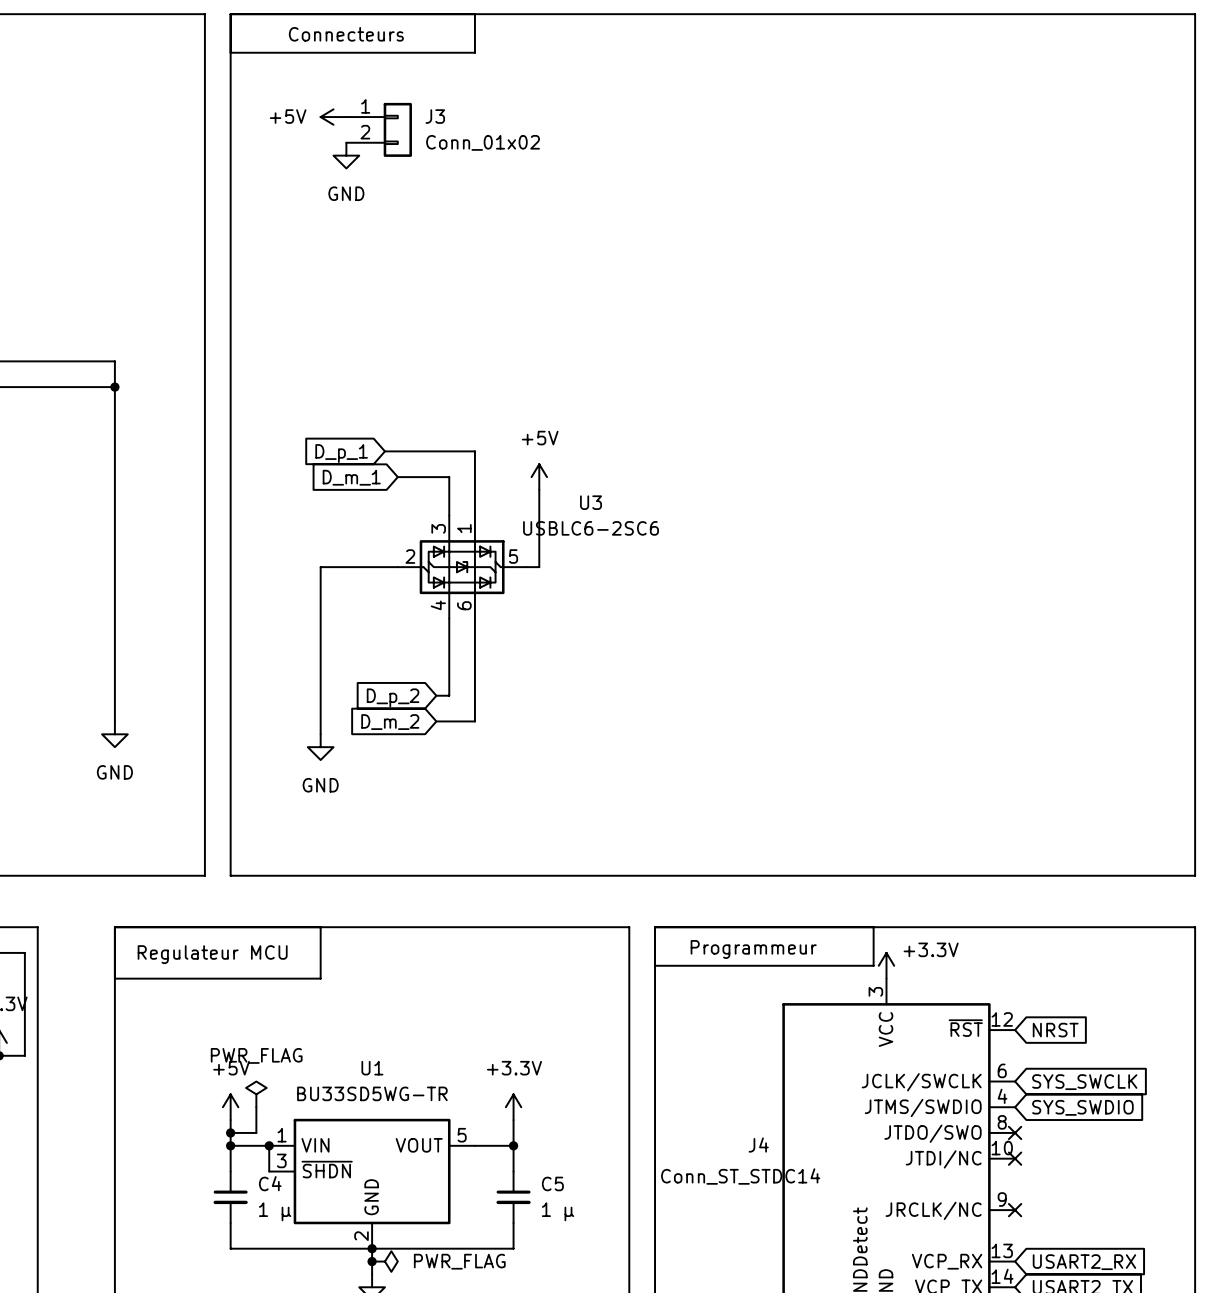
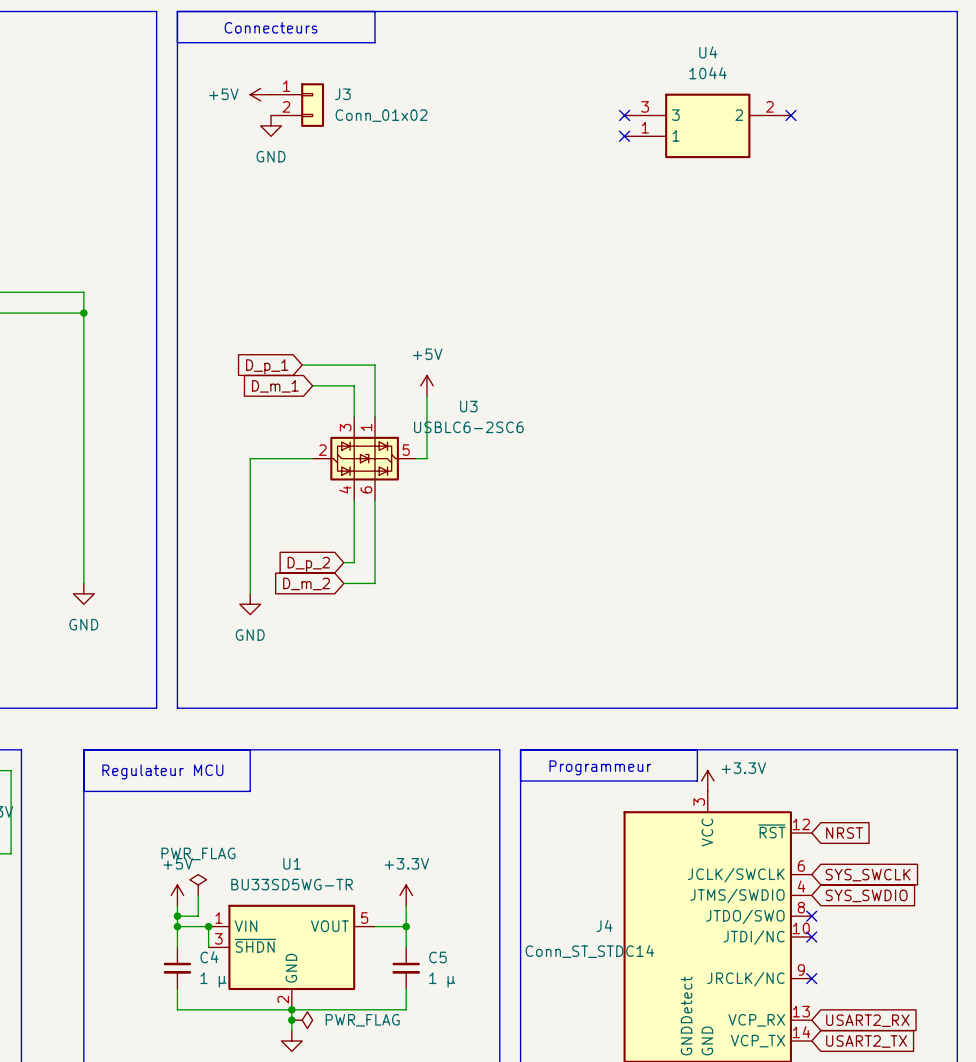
no-connect mark: none -> (624, 115)
no-connect mark: none -> (790, 115)
U4: none -> 1044 (707, 125)
no-connect mark: none -> (624, 136)

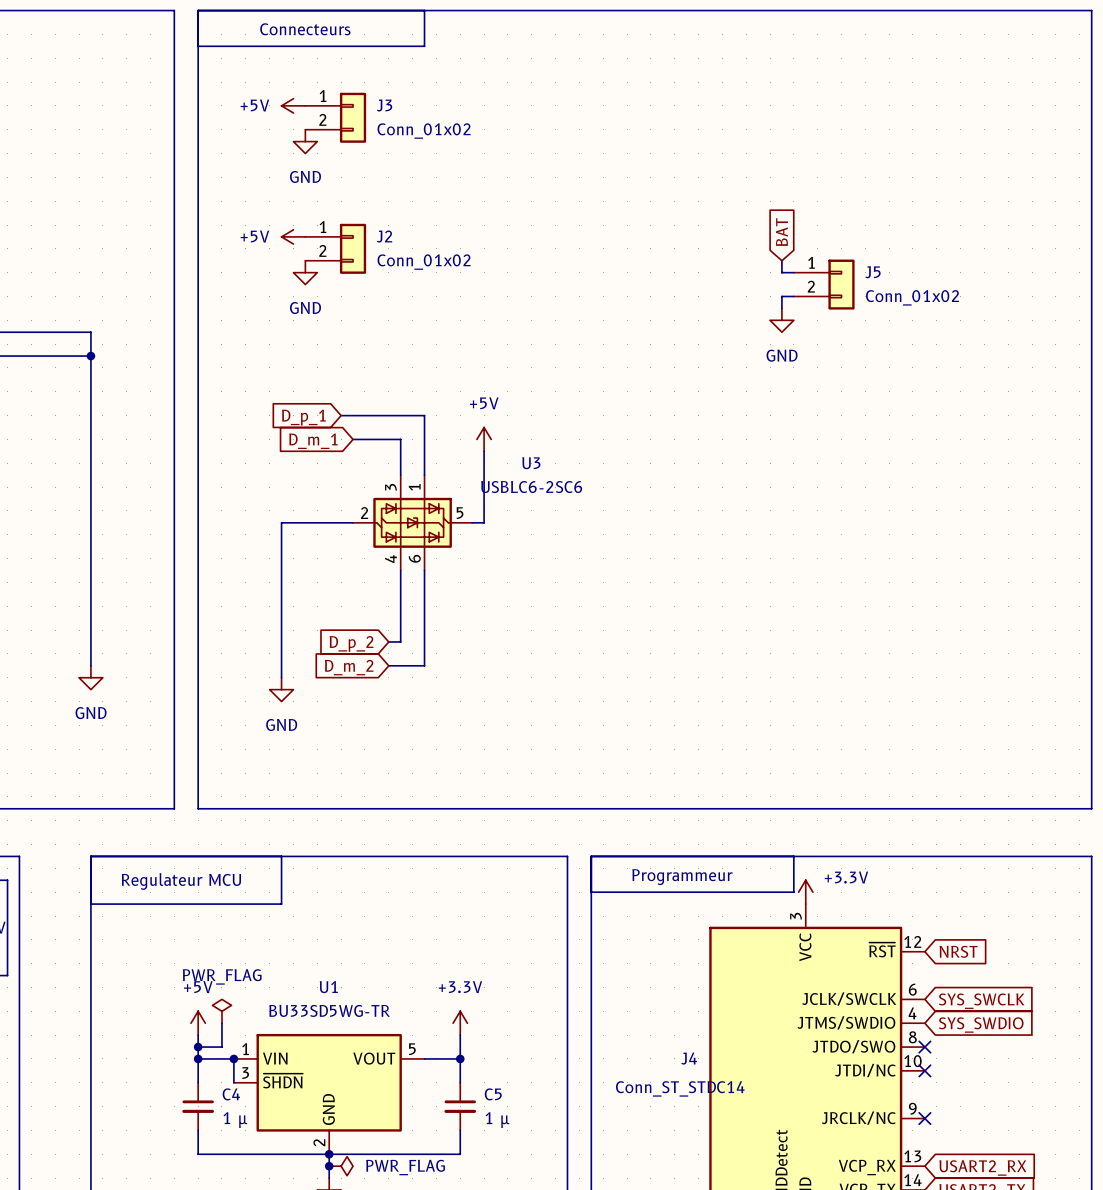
no-connect mark: (624, 115) -> none
no-connect mark: (790, 115) -> none
U4: 1044 (707, 125) -> none
no-connect mark: (624, 136) -> none
global label: none -> BAT (781, 232)
power symbol: none -> +5V (293, 236)
J2: none -> Conn_01x02 (335, 248)
wire: none -> (781, 260) (781, 272) (793, 272)
power symbol: none -> GND (305, 272)
J5: none -> Conn_01x02 (824, 284)
wire: none -> (793, 296) (781, 296) (781, 308)
power symbol: none -> GND (781, 320)

